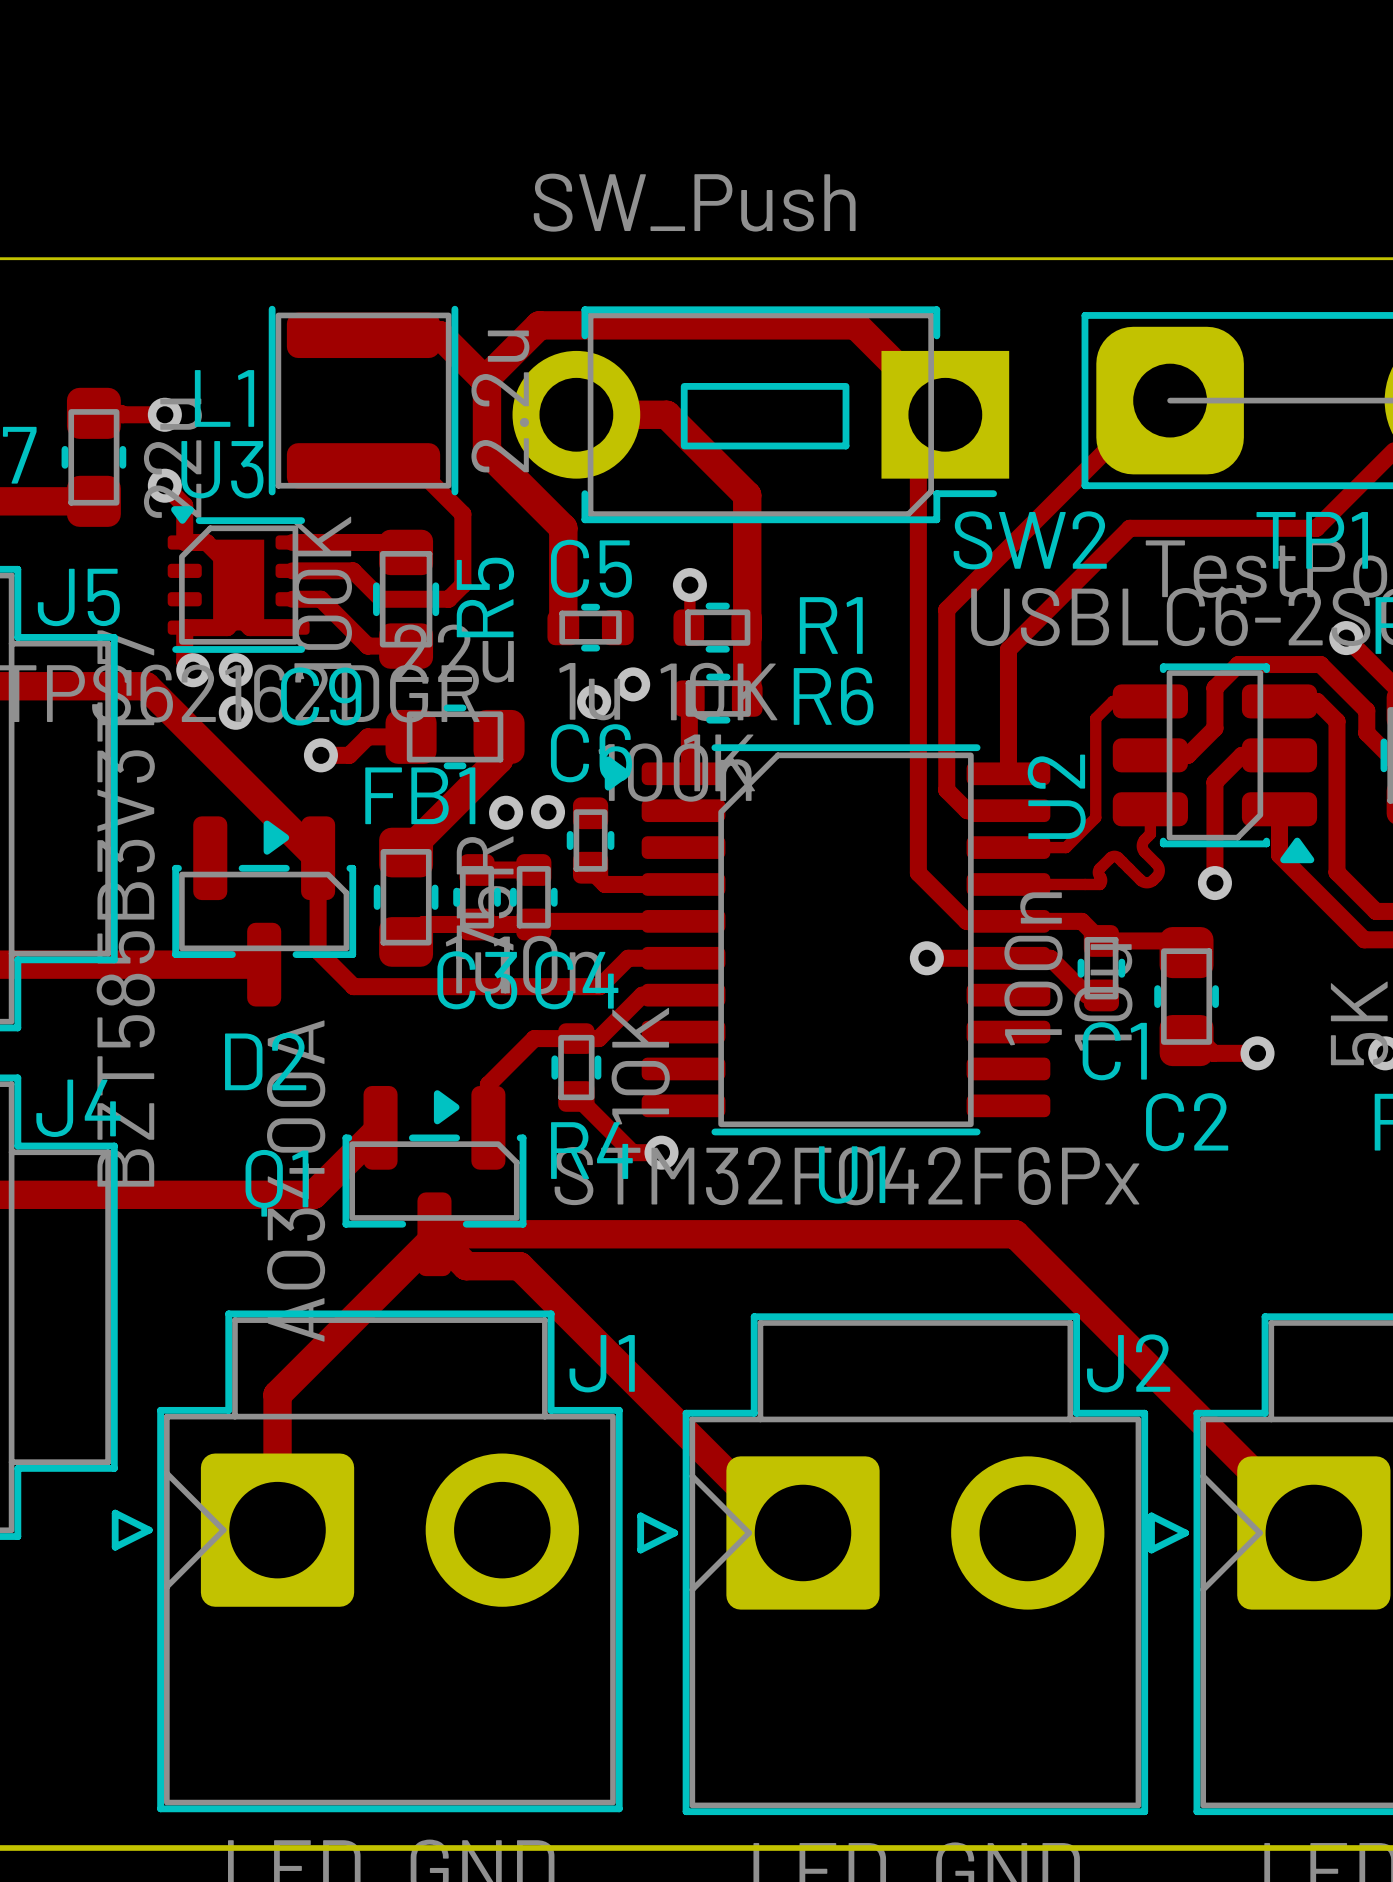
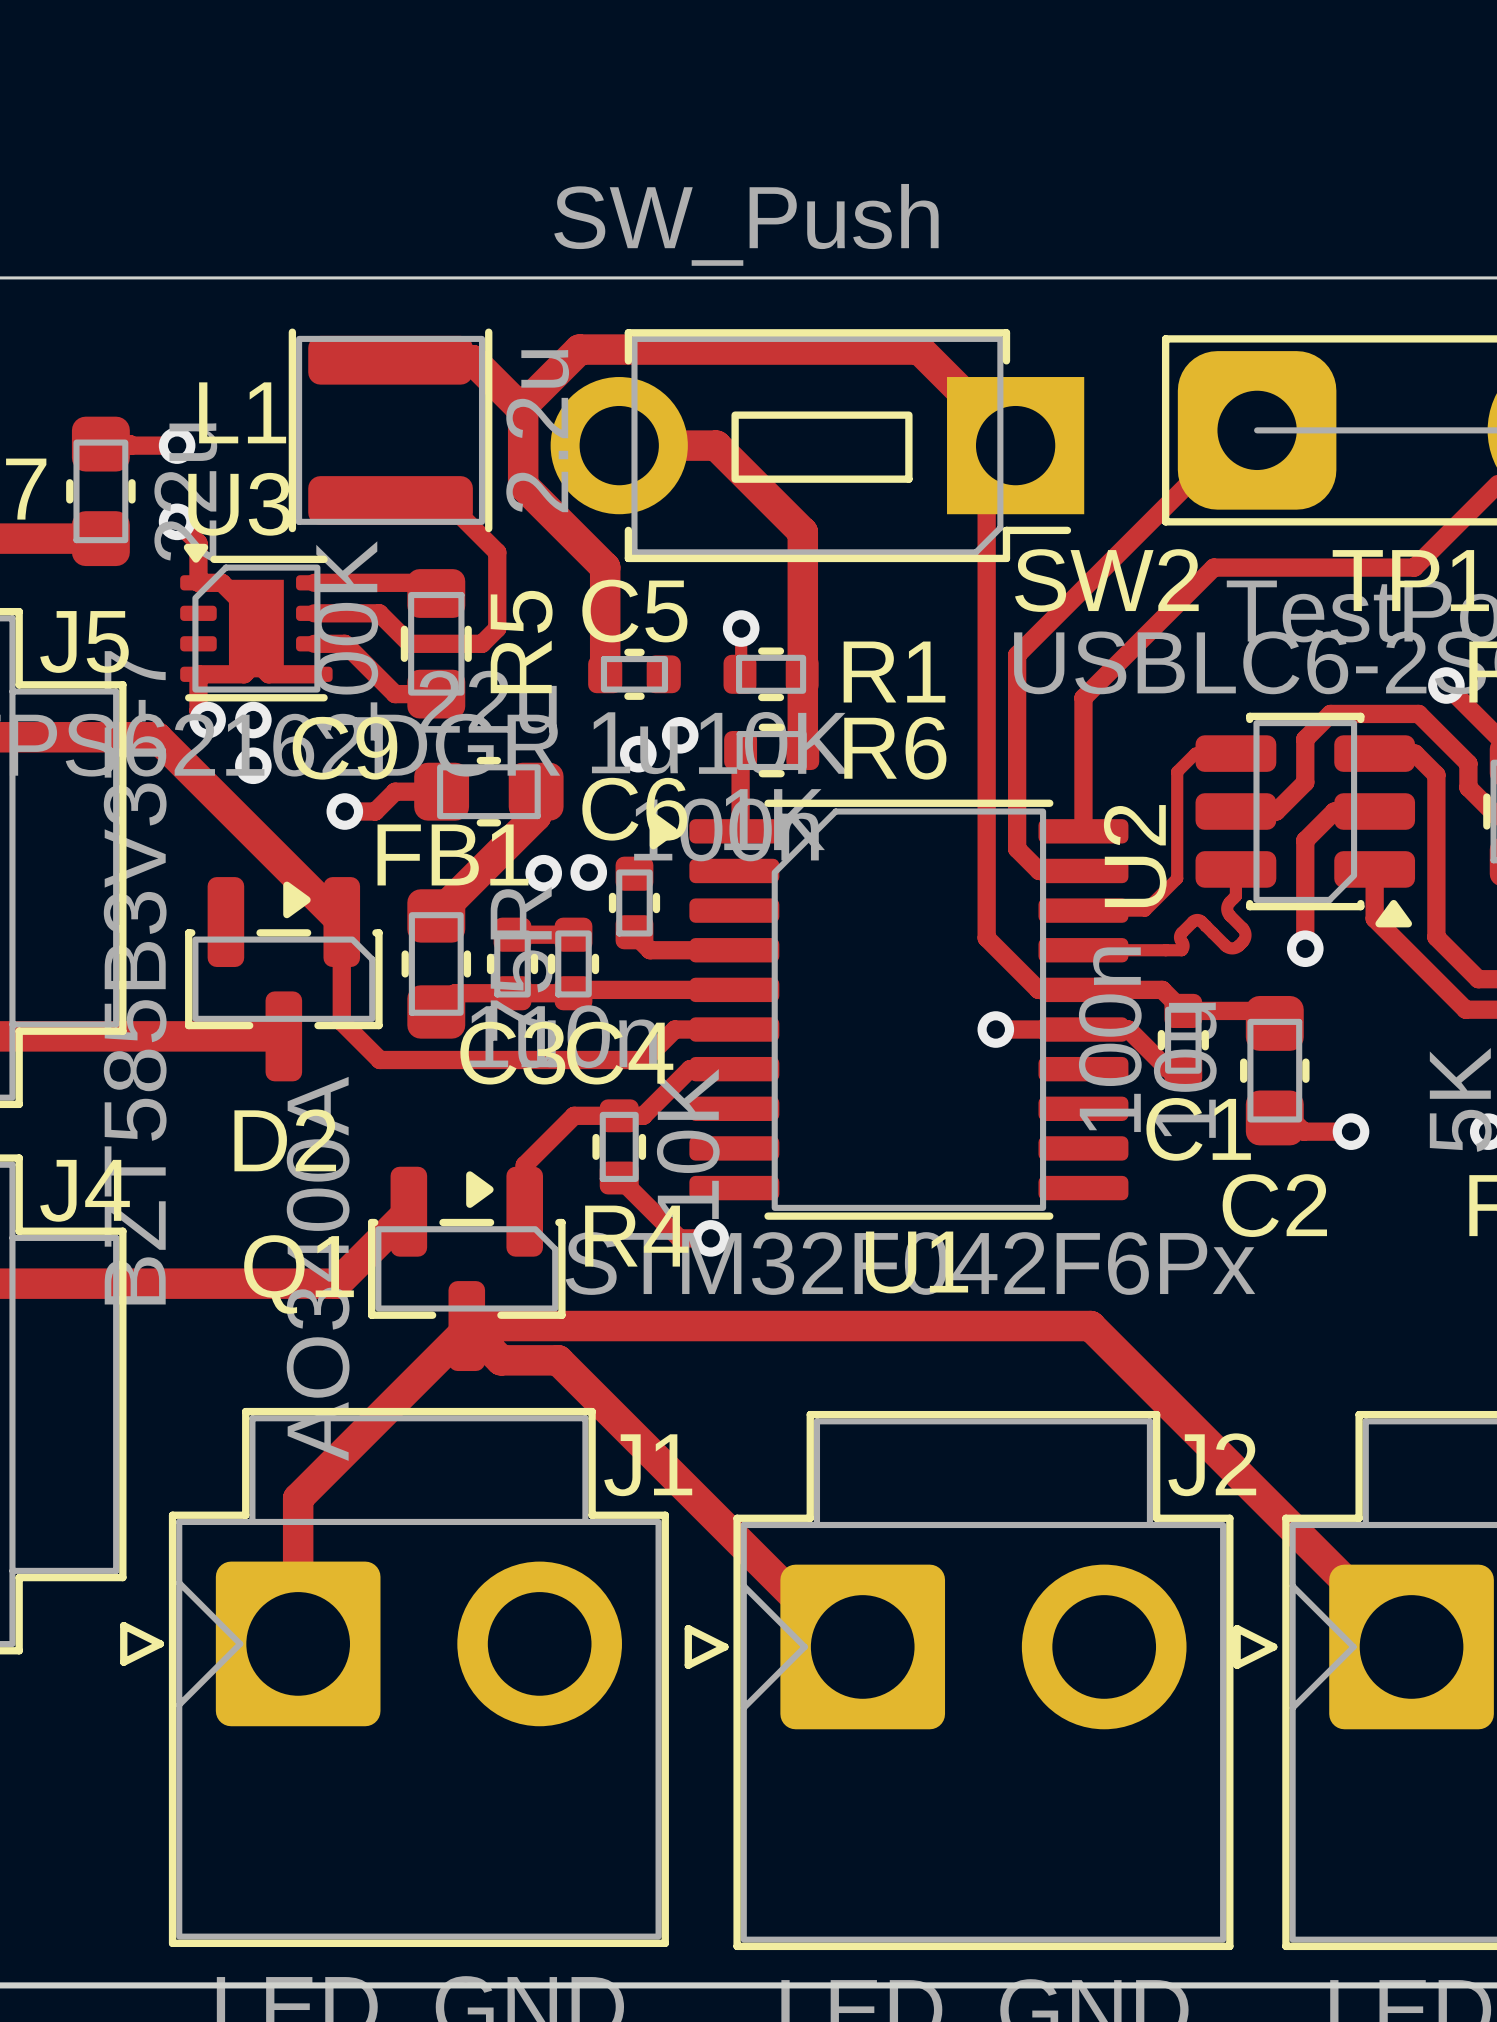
L1 name position: L1 (224, 398) -> L1 (242, 412)

